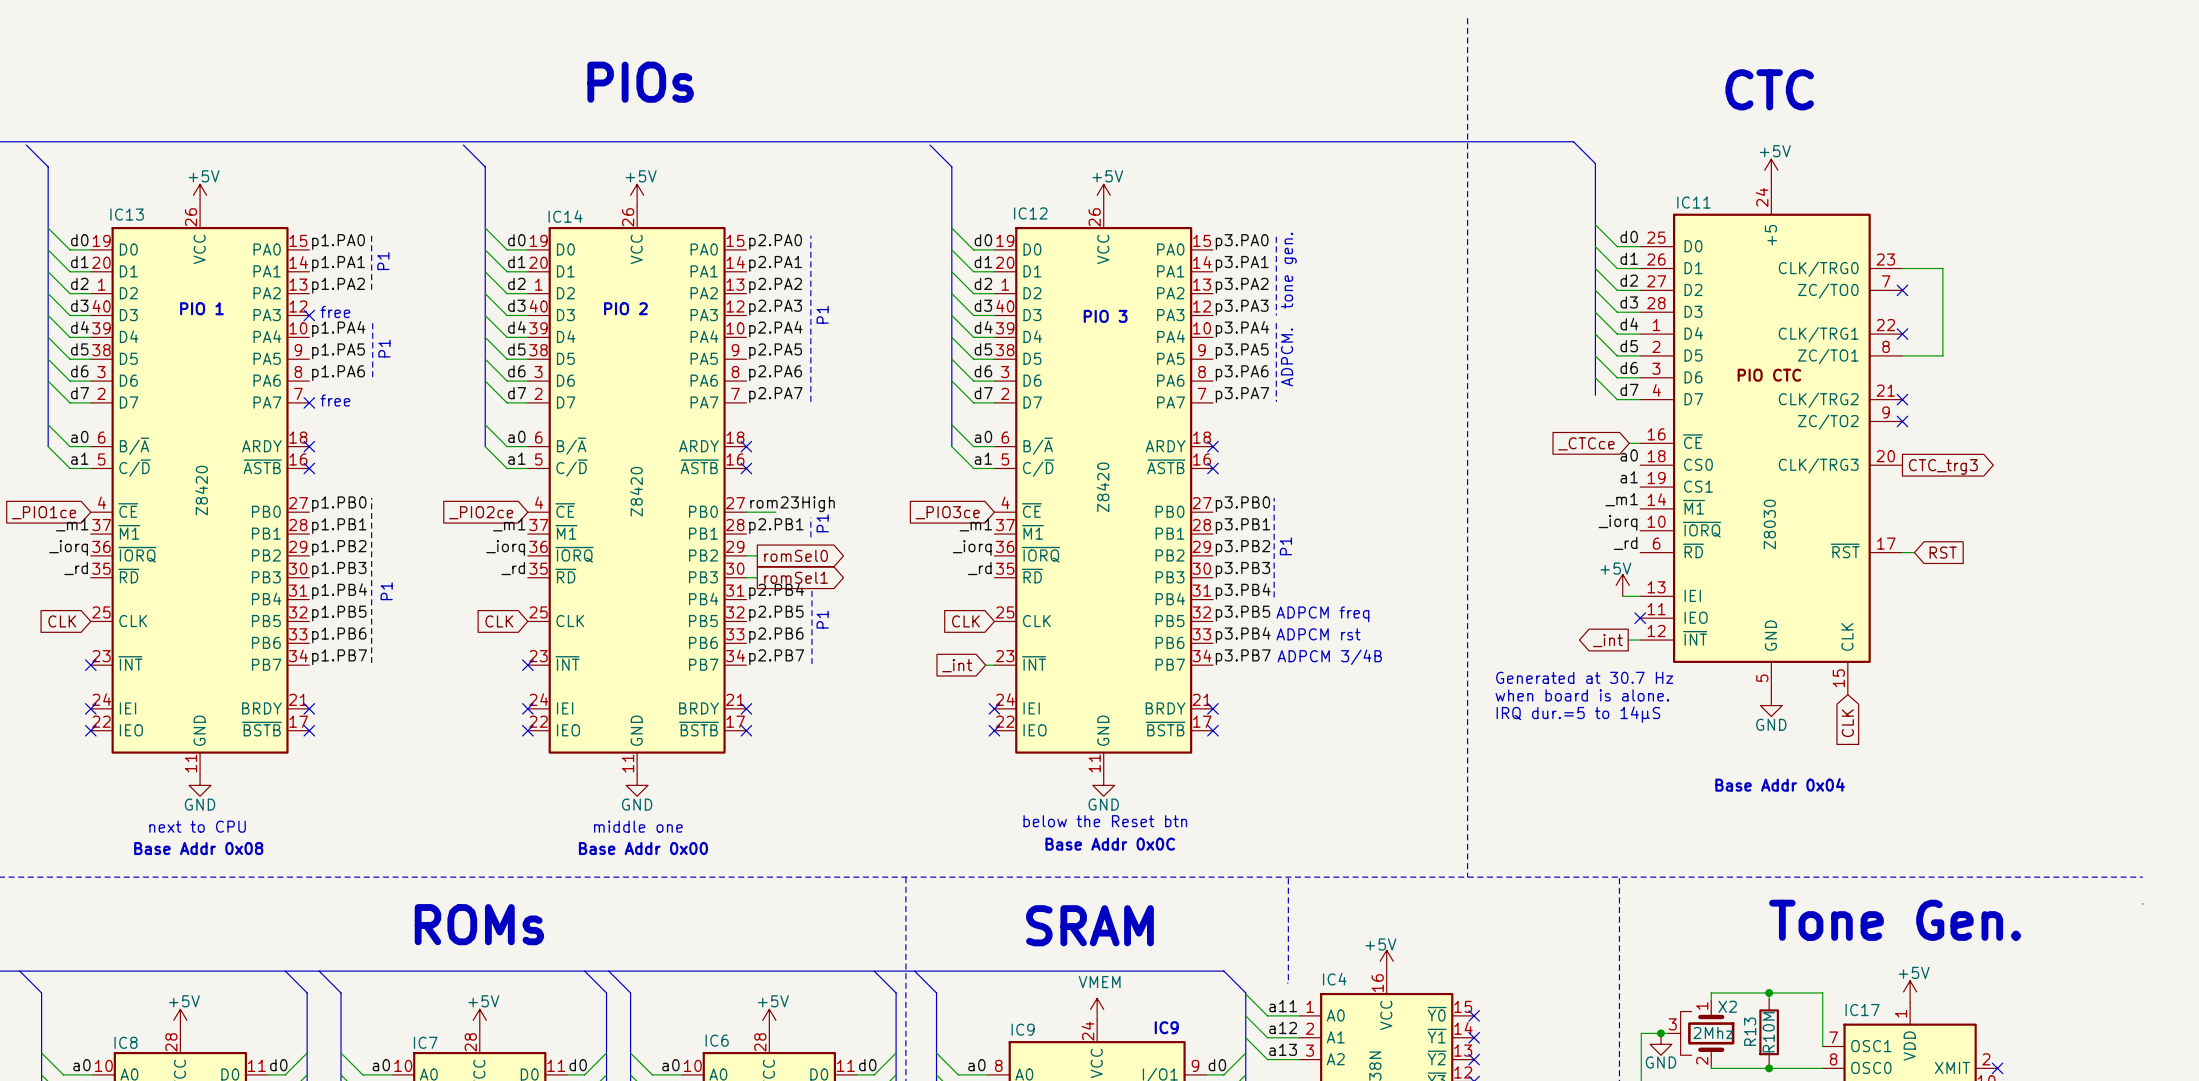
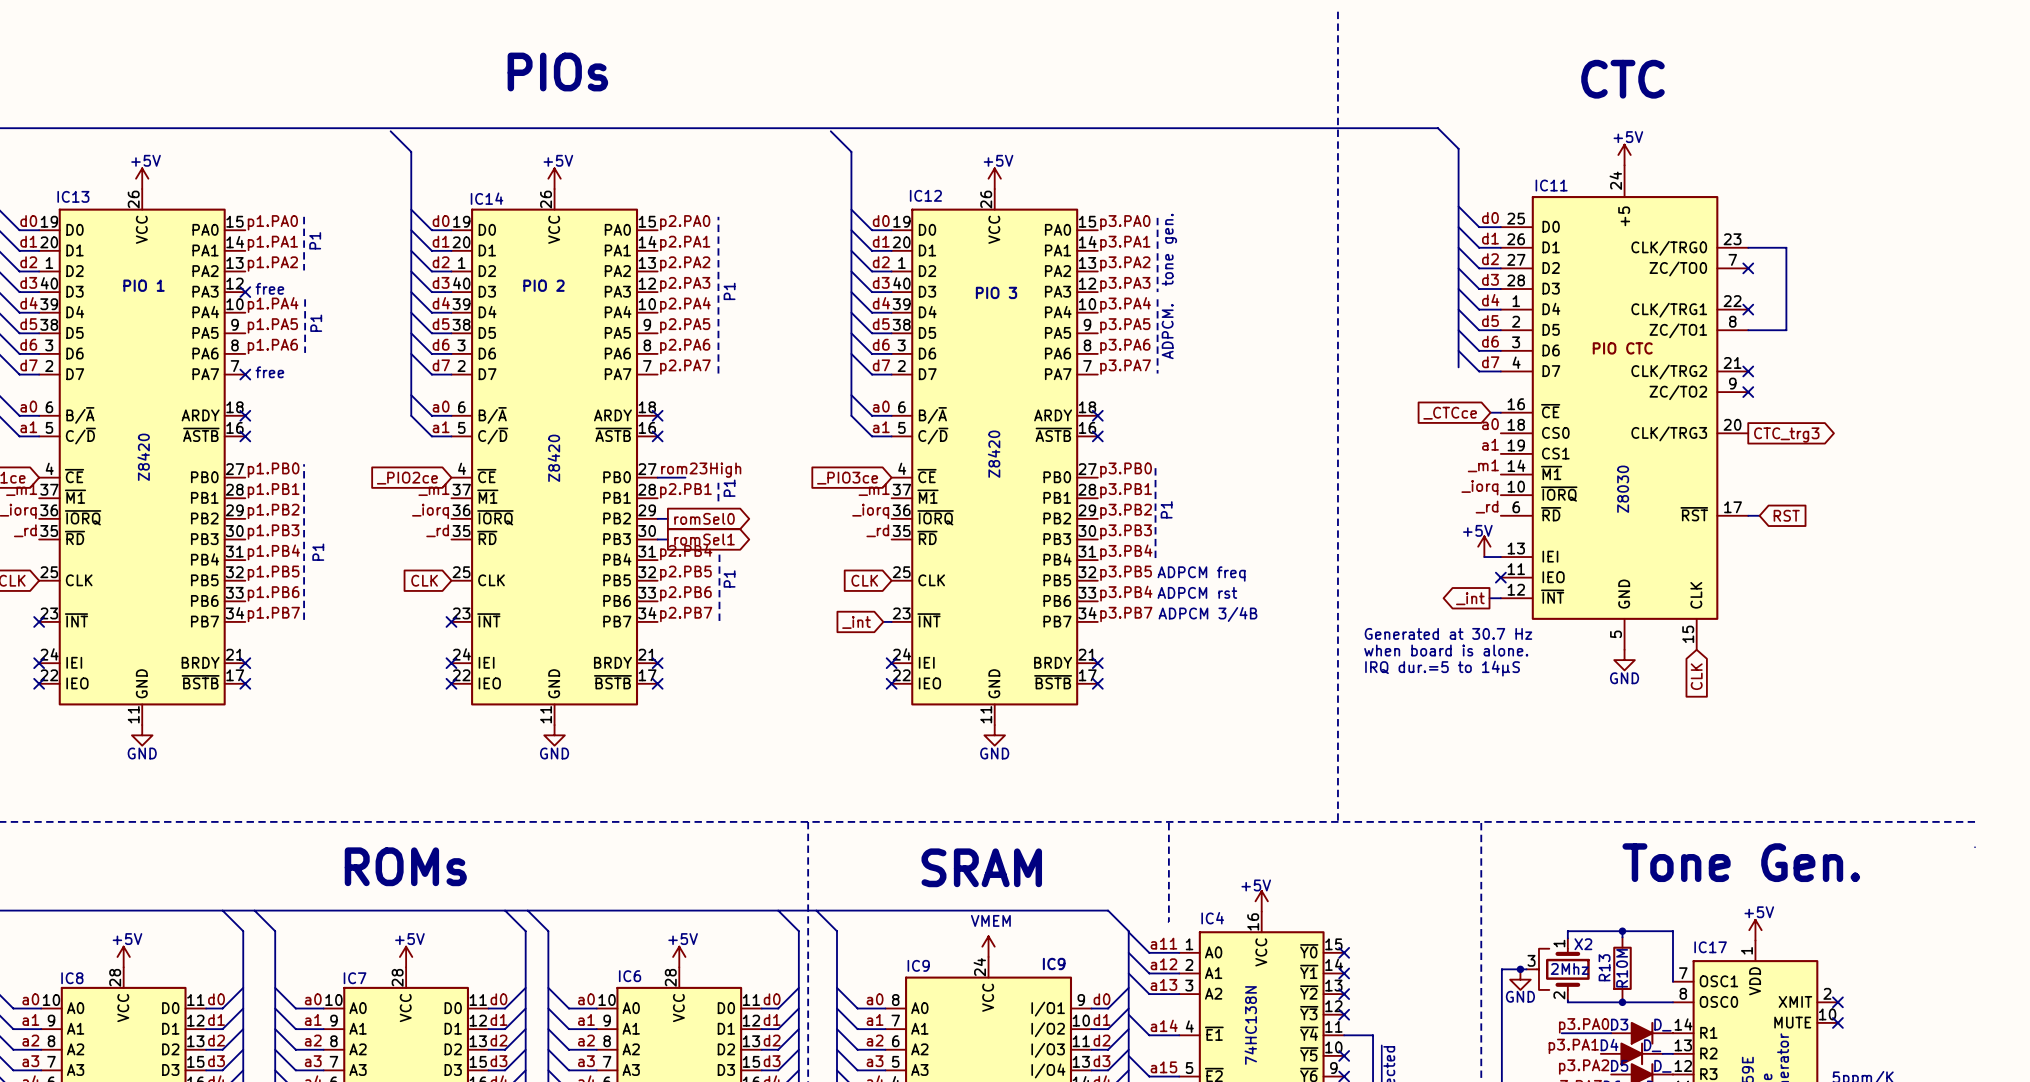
text: Base Addr 0x04 (1780, 784) -> none
text: below the Reset btn (1105, 821) -> none
text: next to CPU (197, 826) -> none
text: middle one (638, 826) -> none
text: Base Addr 0x0C (1110, 844) -> none
text: Base Addr 0x08 (198, 848) -> none
text: Base Addr 0x00 (643, 848) -> none

